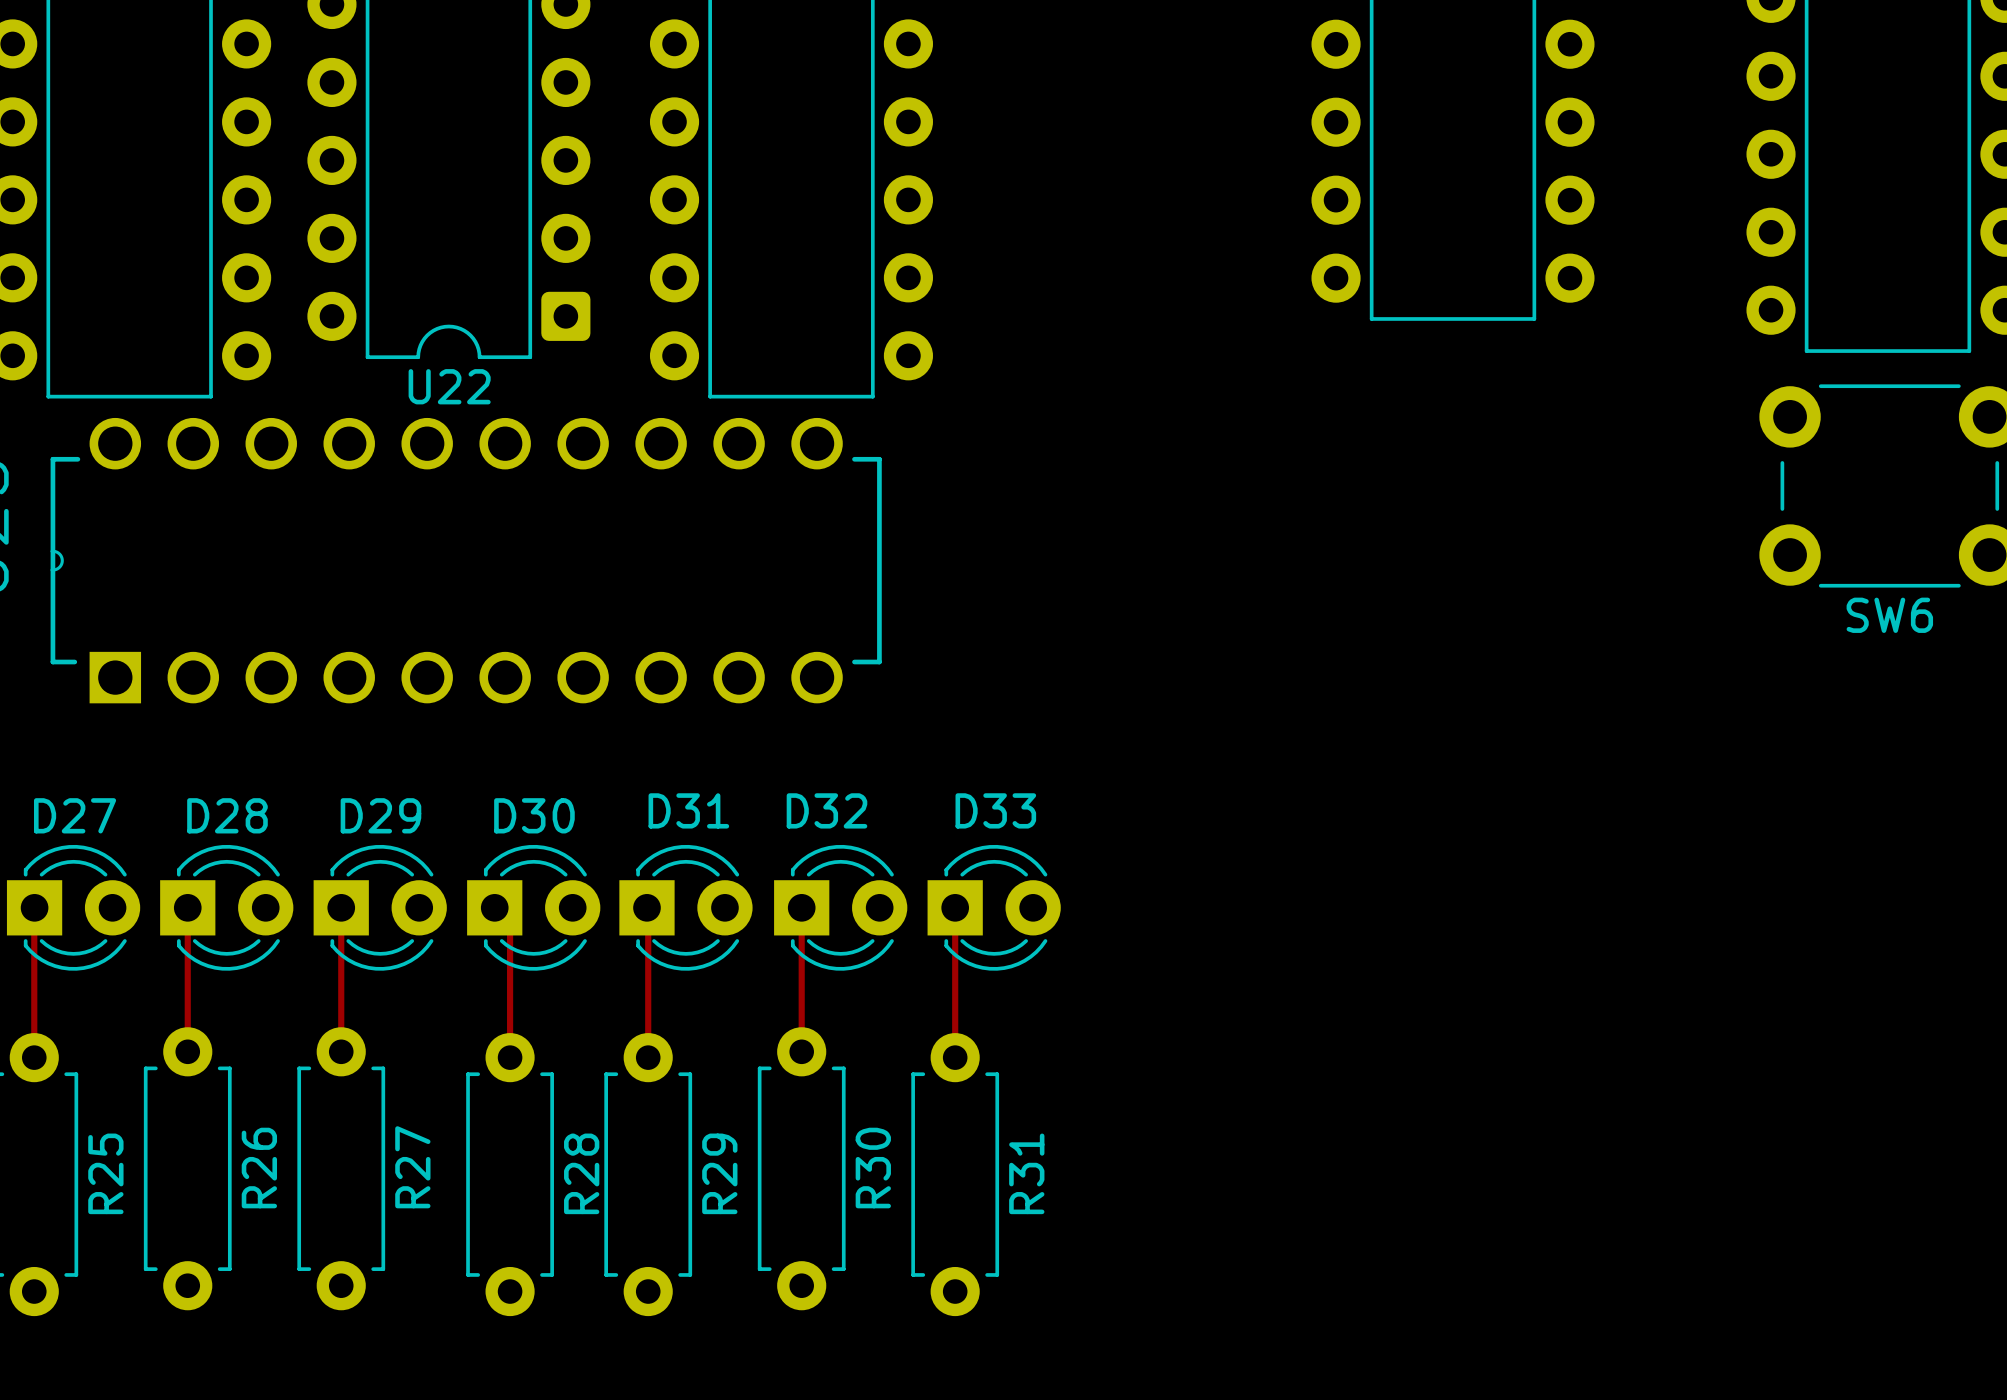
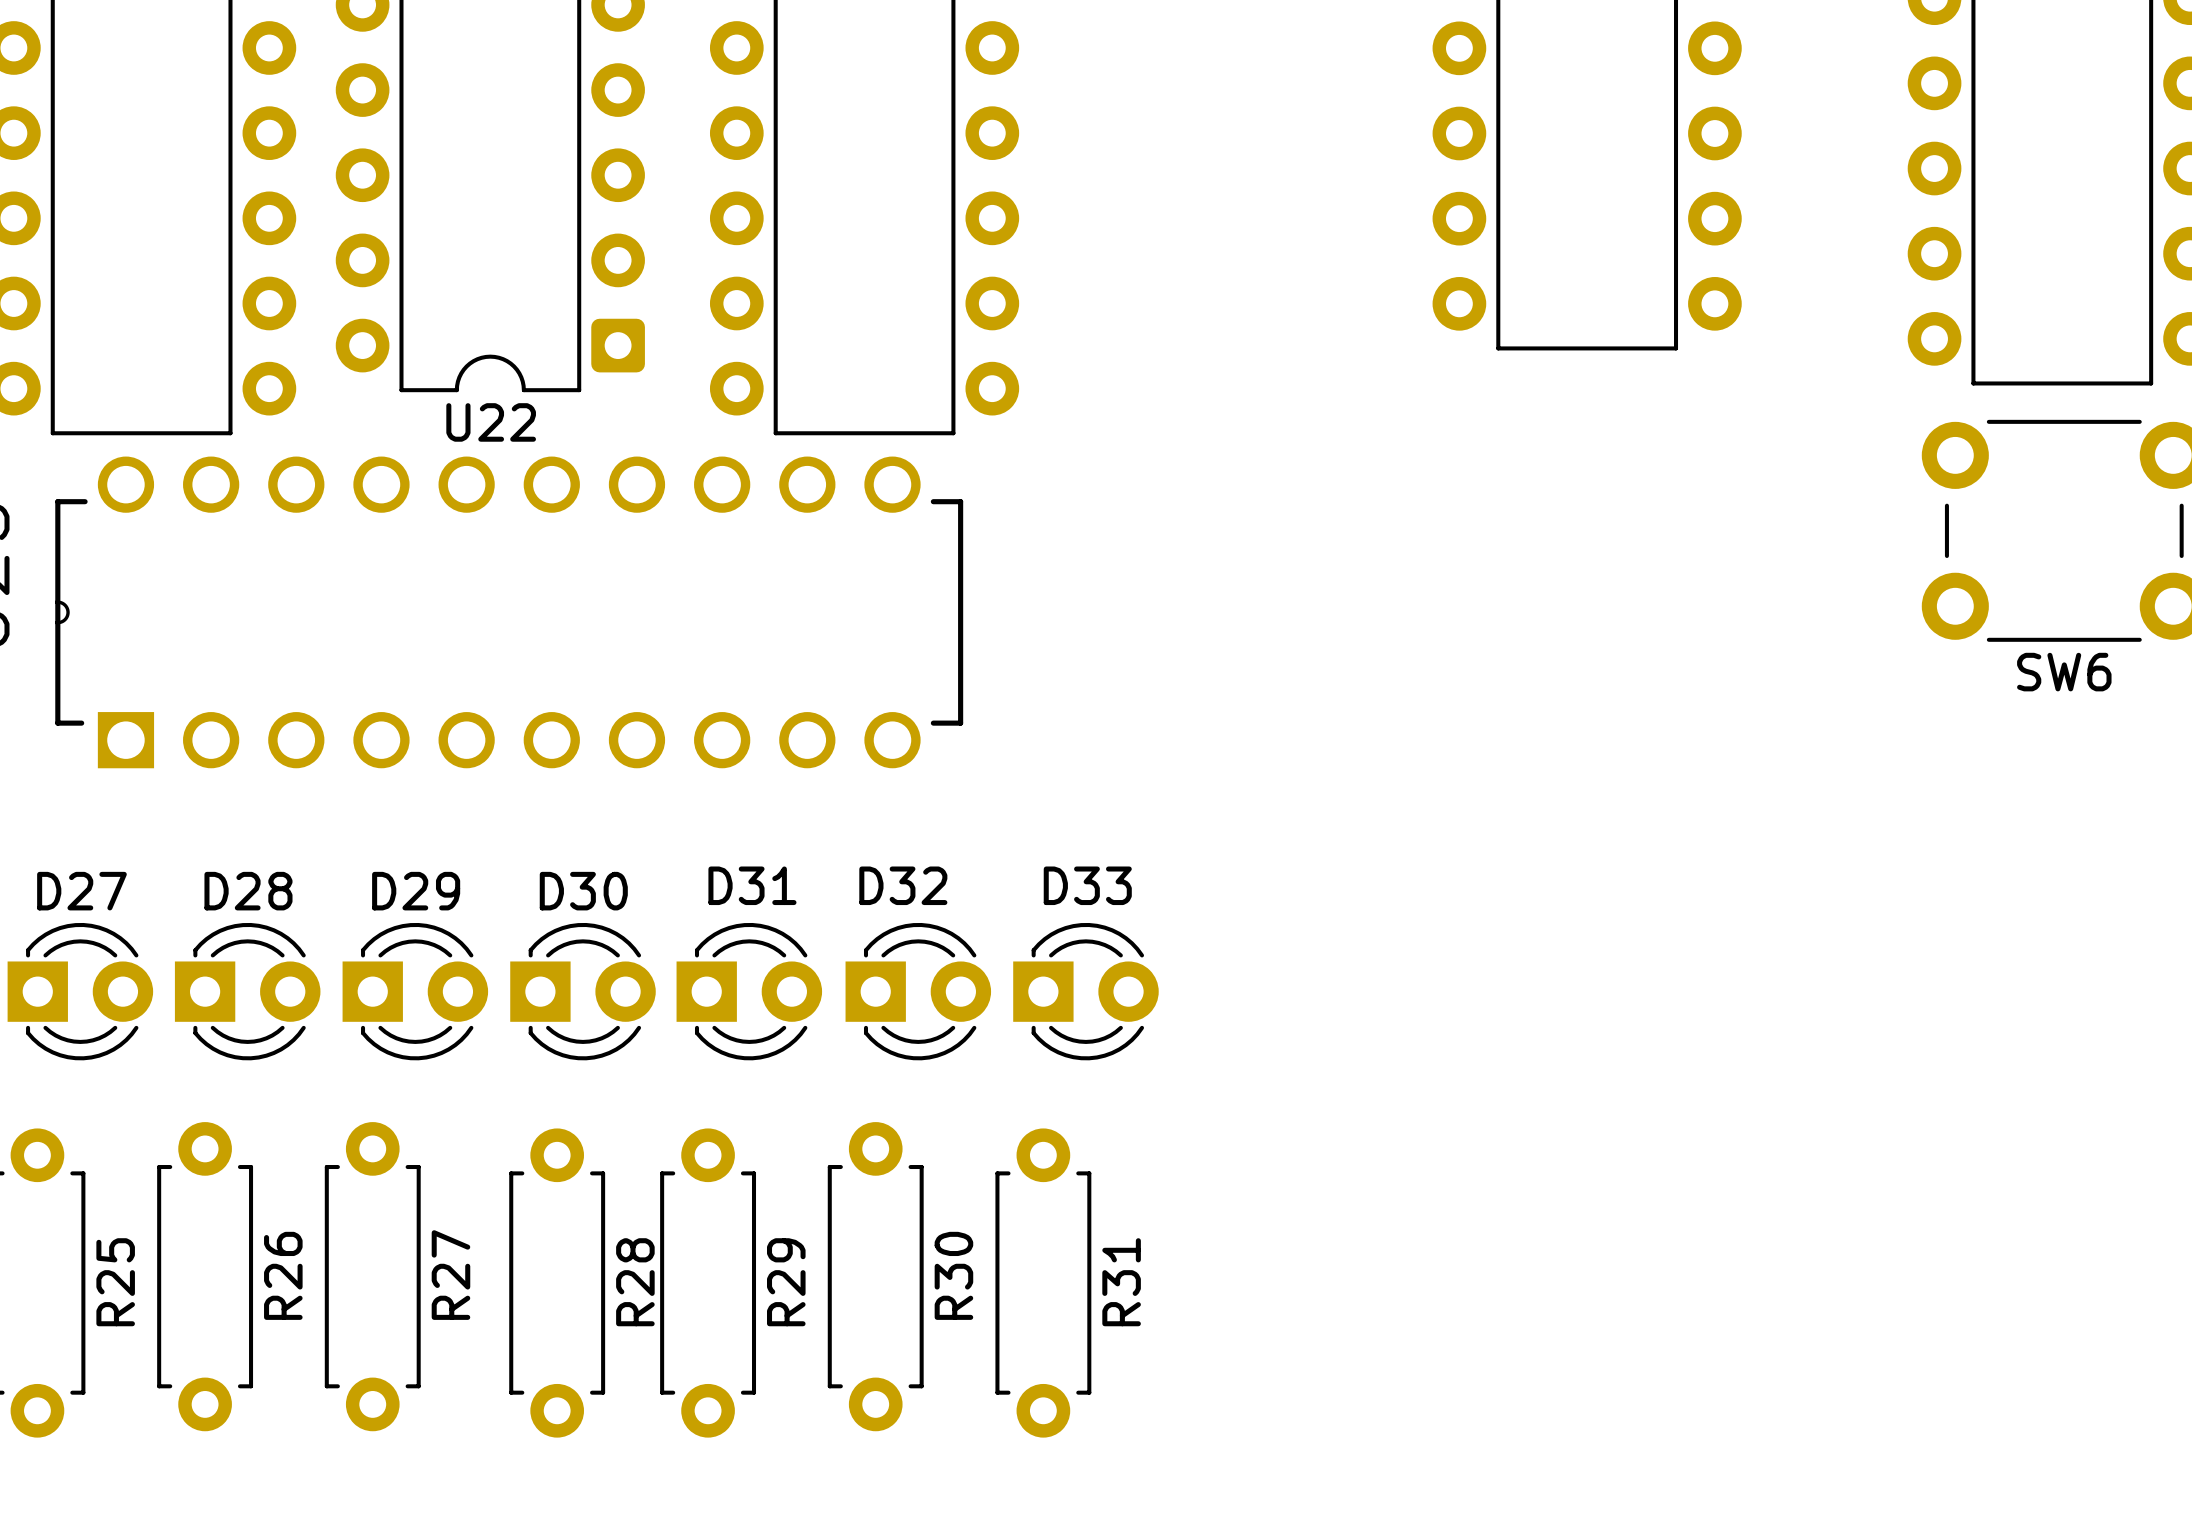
top track: (187, 907) (187, 1051) -> none
top track: (341, 907) (341, 1051) -> none
top track: (494, 907) (510, 923) (510, 1057) -> none
top track: (646, 907) (648, 1057) -> none
top track: (801, 907) (801, 1051) -> none
top track: (955, 907) (955, 1057) -> none
top track: (34, 908) (34, 1057) -> none

